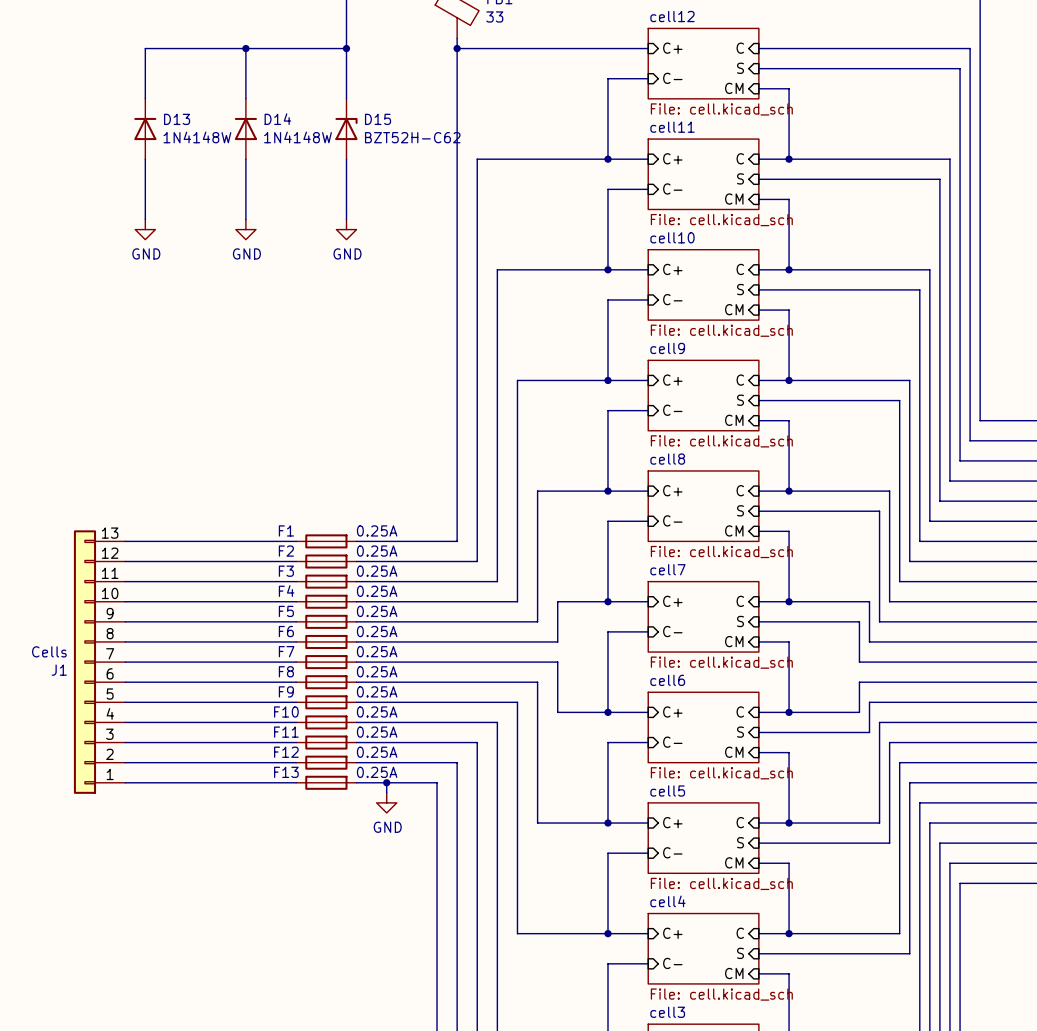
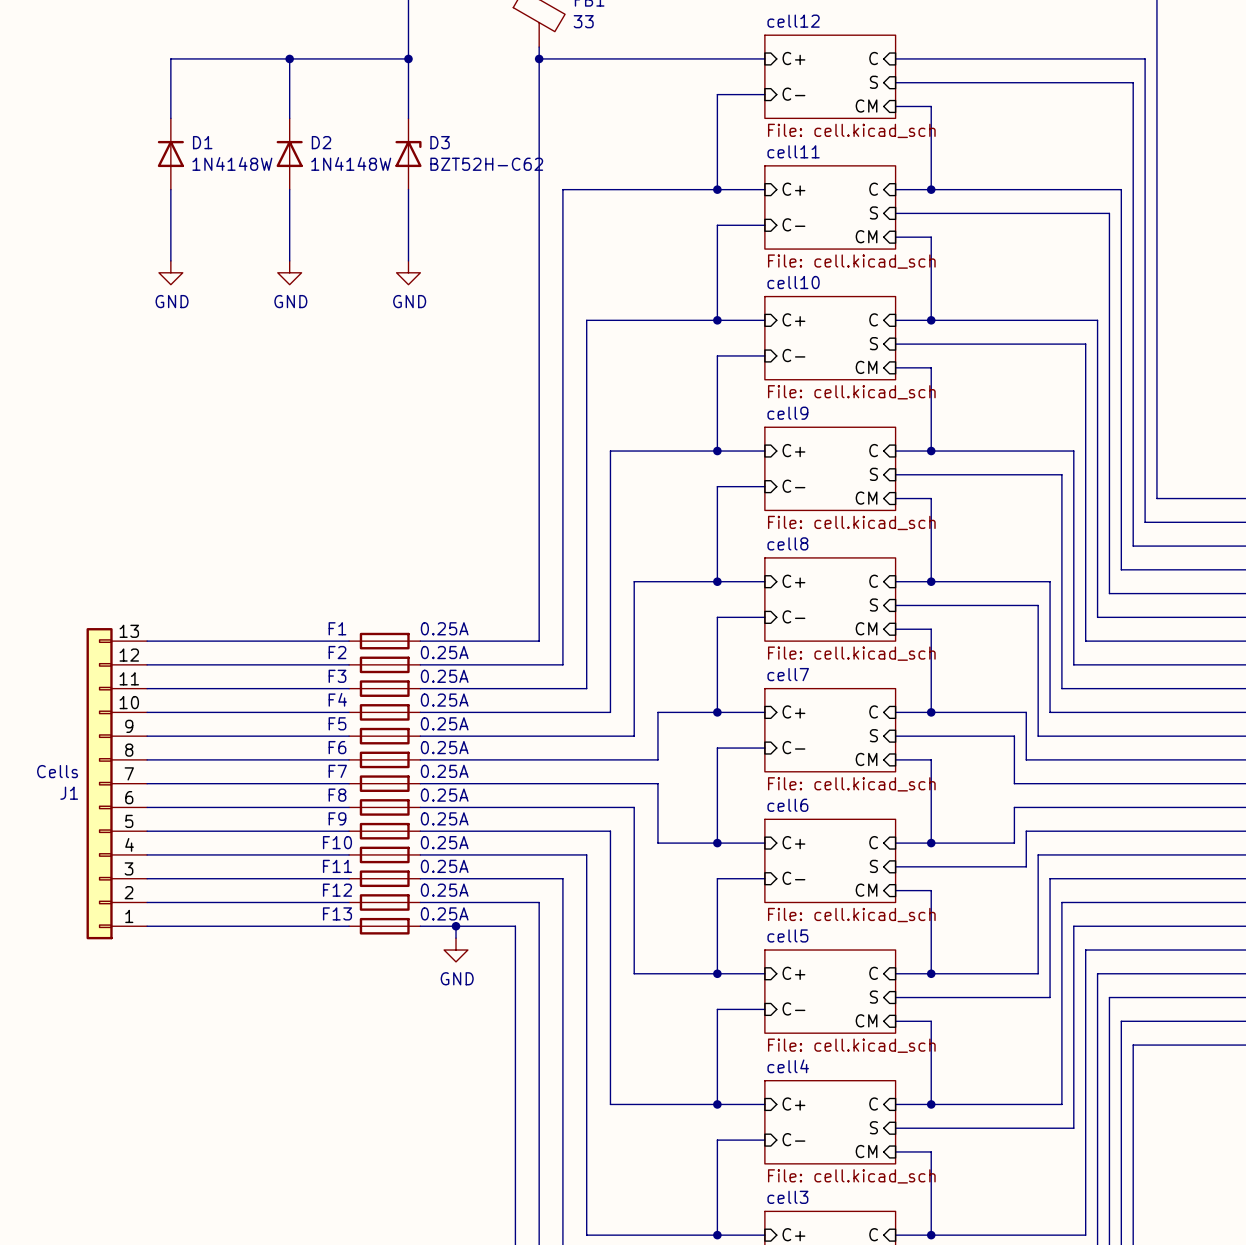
D13 name: D13 (177, 119) -> D1 (202, 142)
D14 name: D14 (277, 119) -> D2 (321, 142)
D15 name: D15 (378, 119) -> D3 (440, 142)

